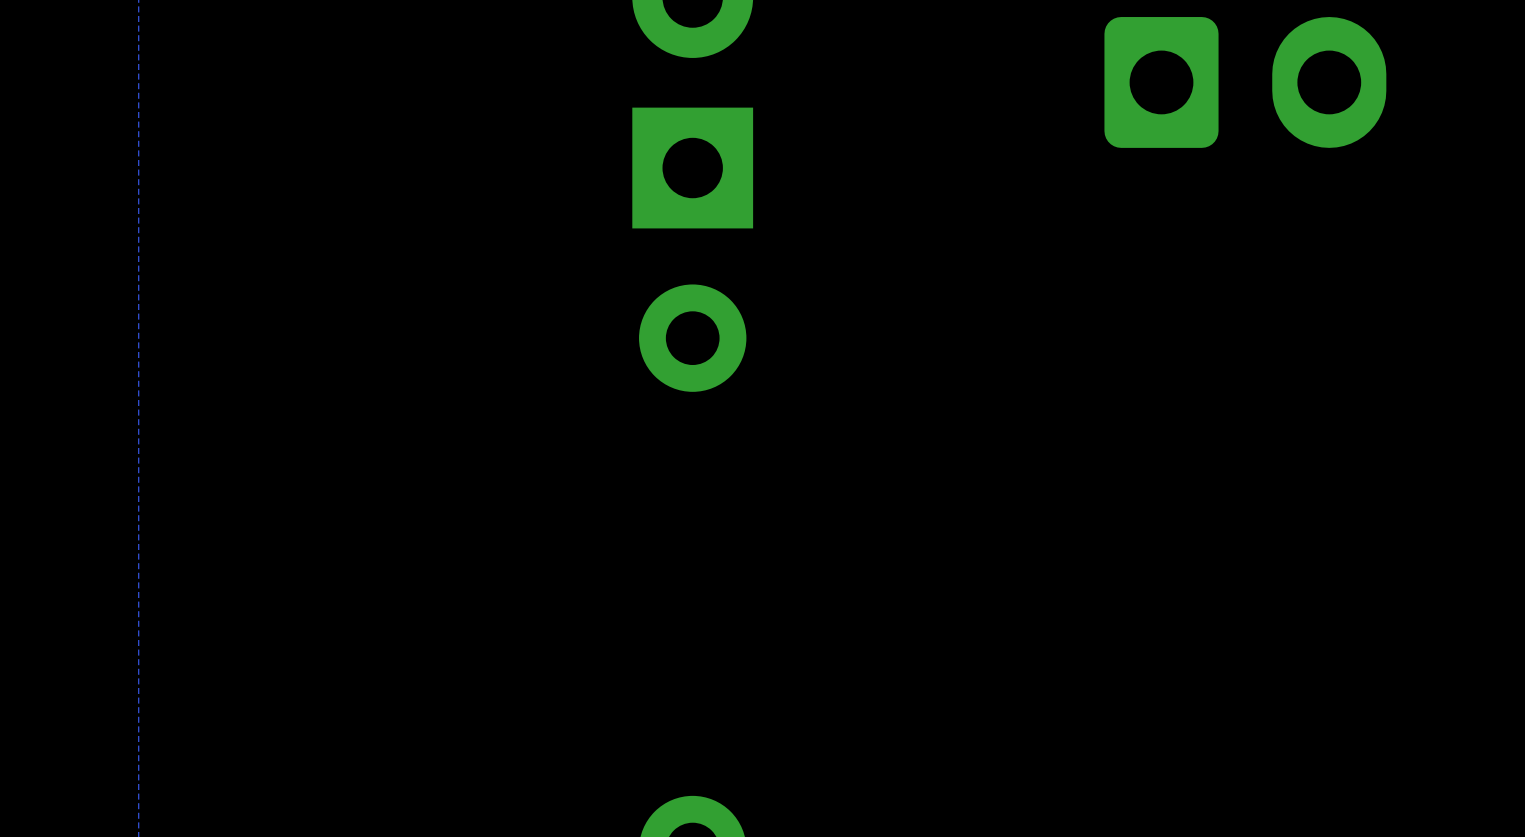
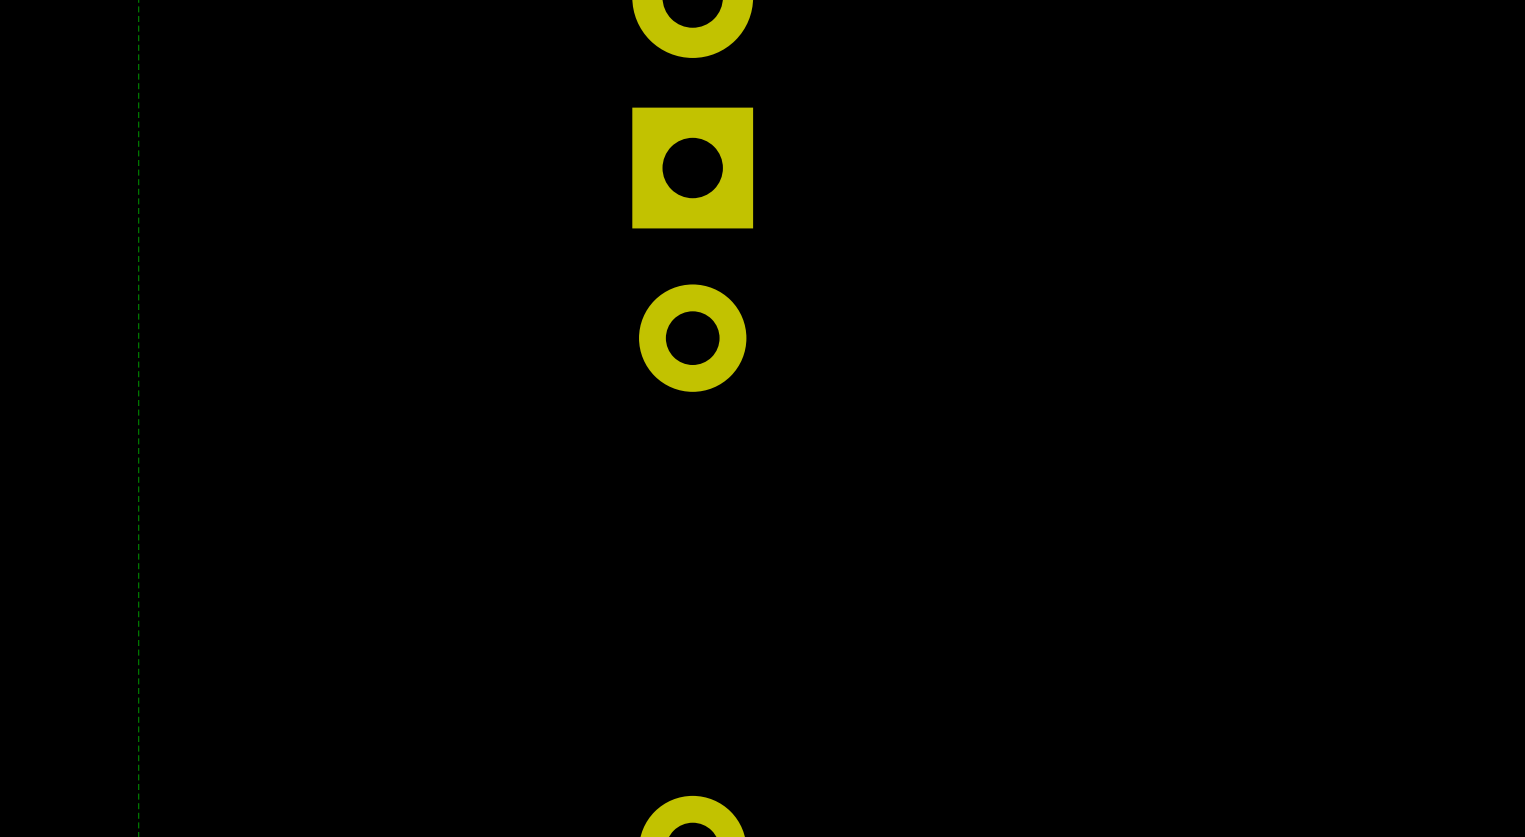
part: (1245, 82) -> none

